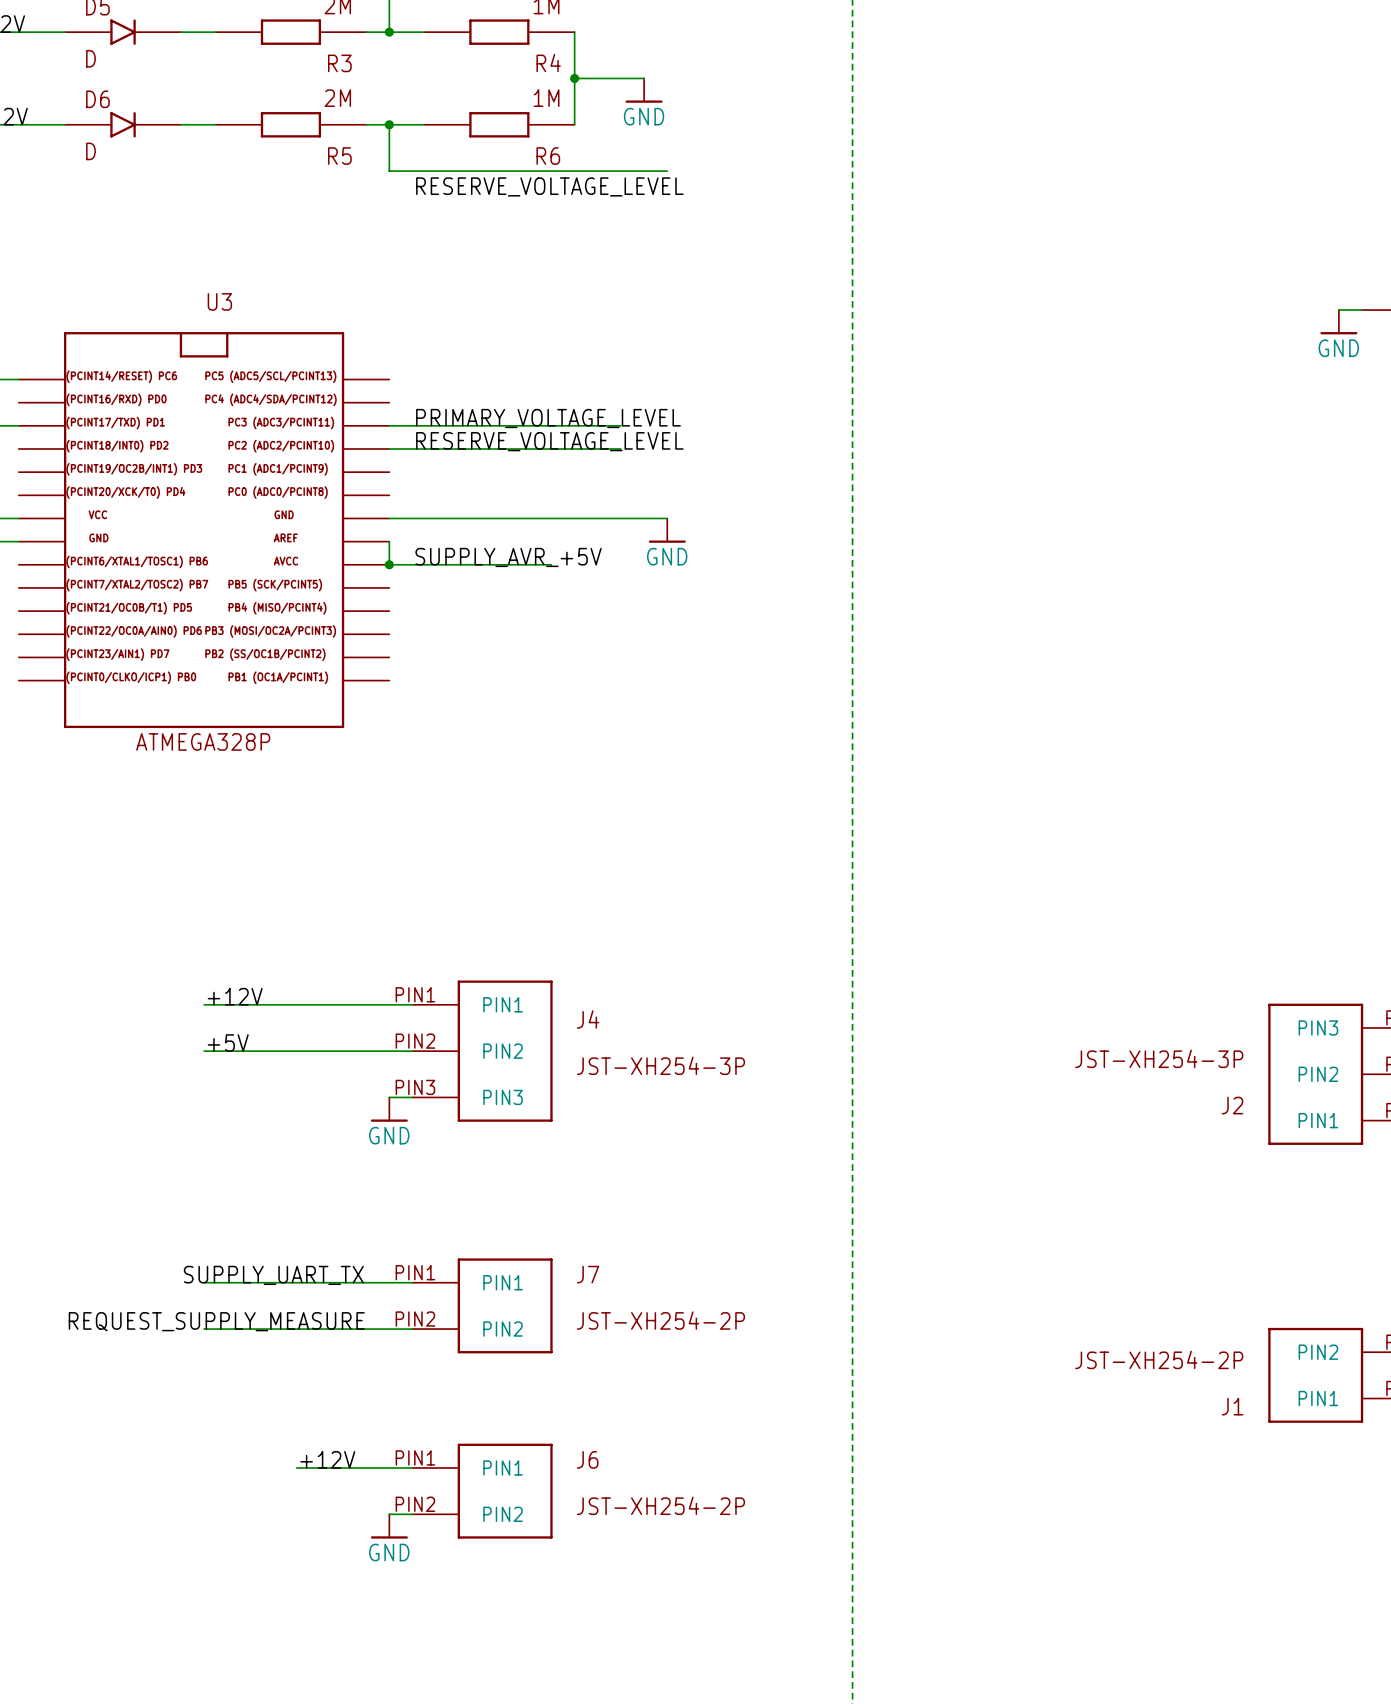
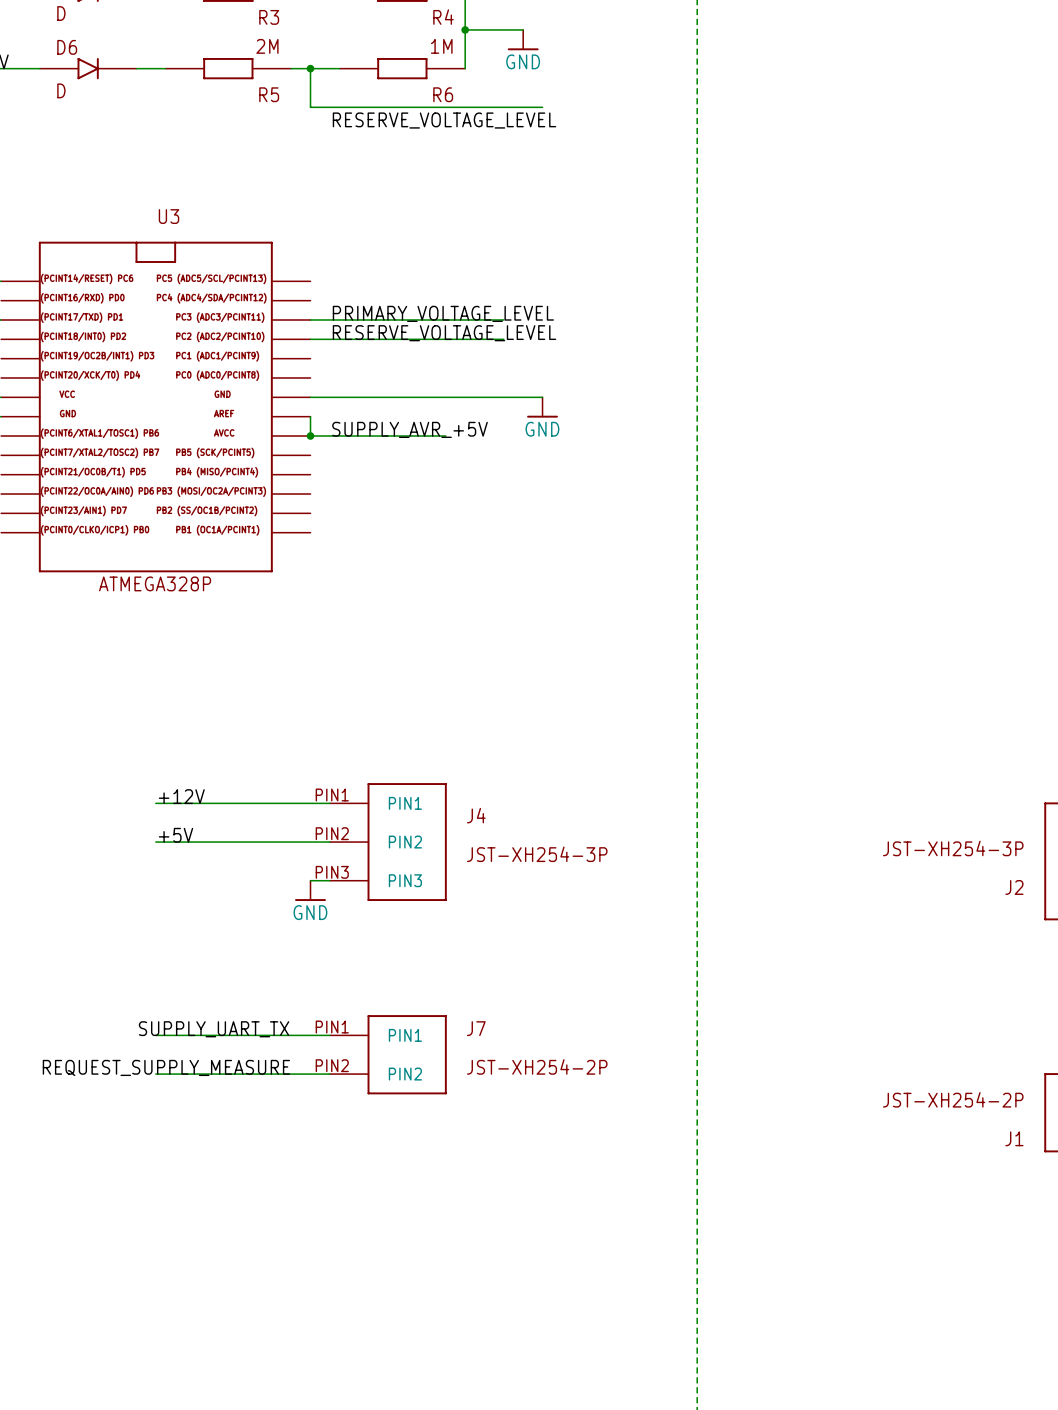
label: +12V (327, 1459) -> none
wire: (296, 1467) (412, 1467) -> none
J6: JST-XH254-2P (482, 1491) -> none
wire: (389, 1514) (412, 1514) -> none
power symbol: GND (389, 1526) -> none

